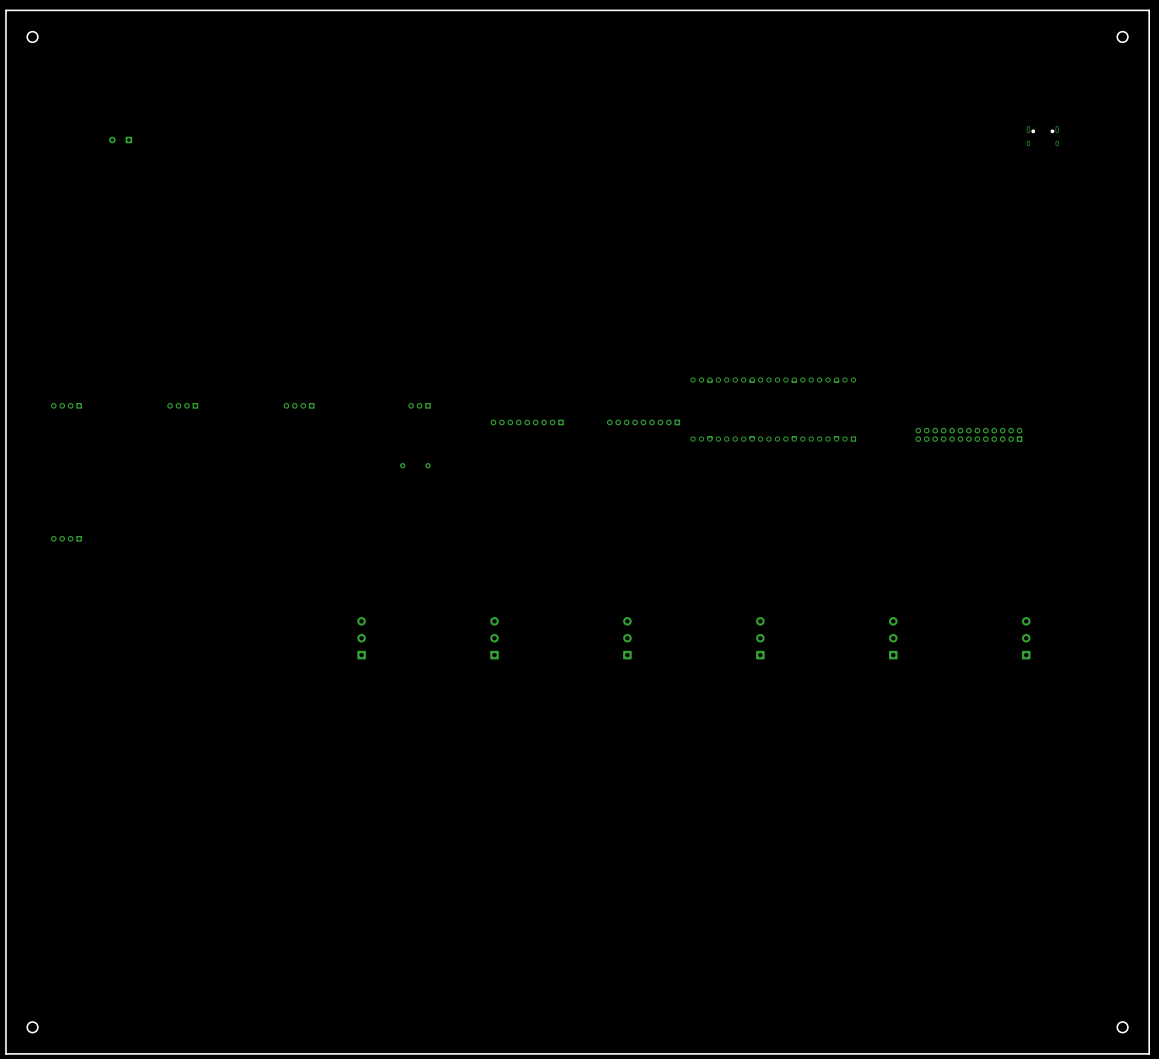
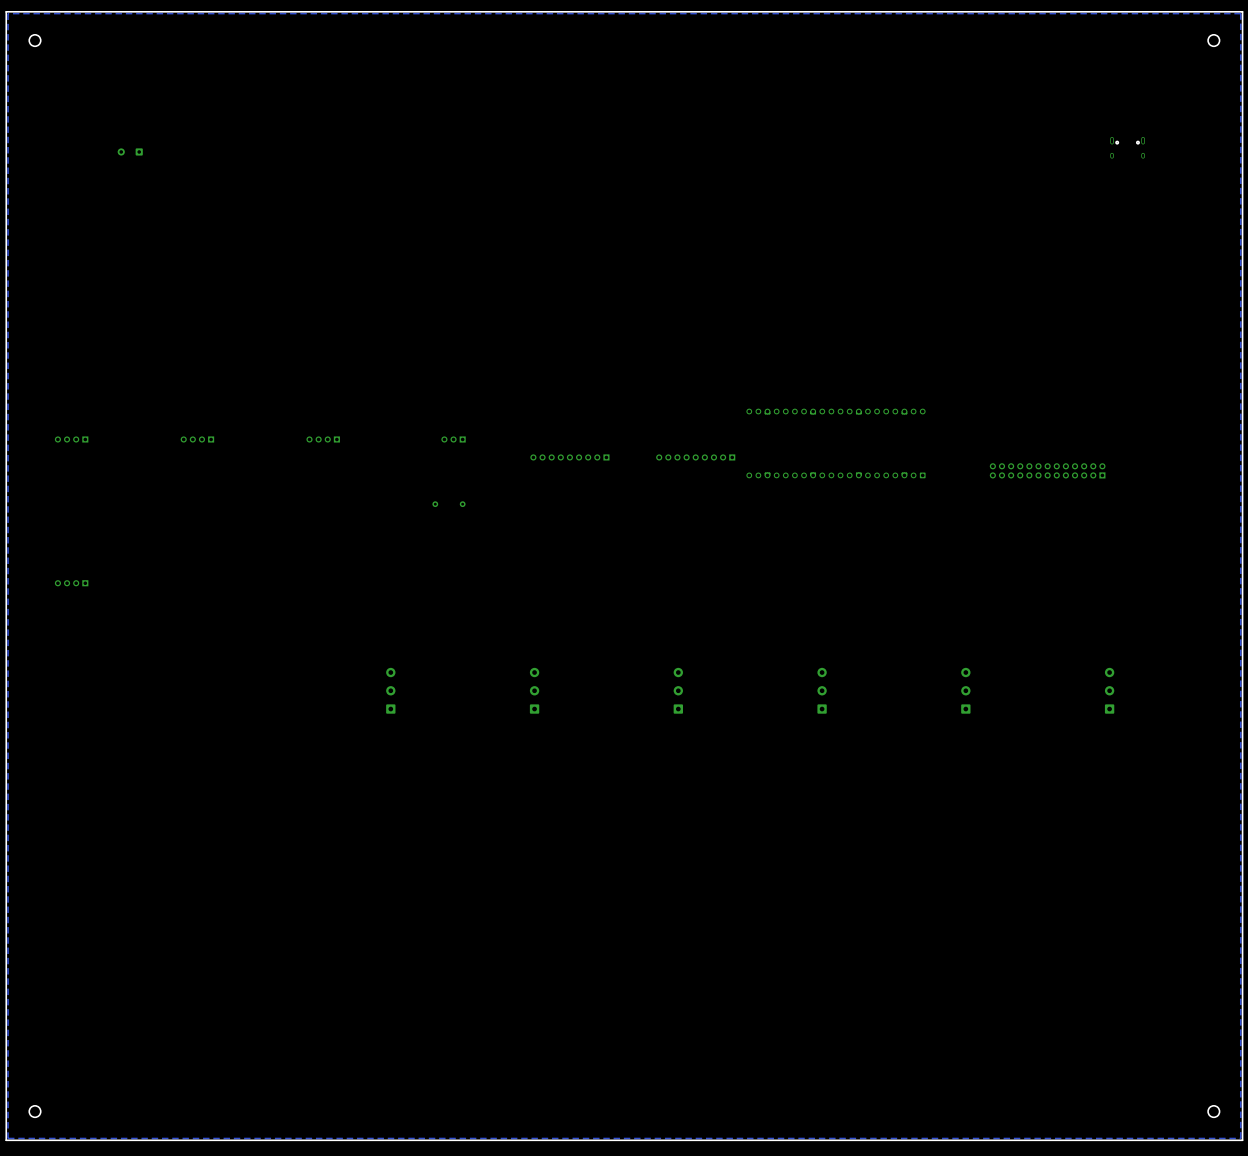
zone outline: none -> (1240, 13) (8, 13) (8, 1138) (1240, 1138) (1240, 13)

